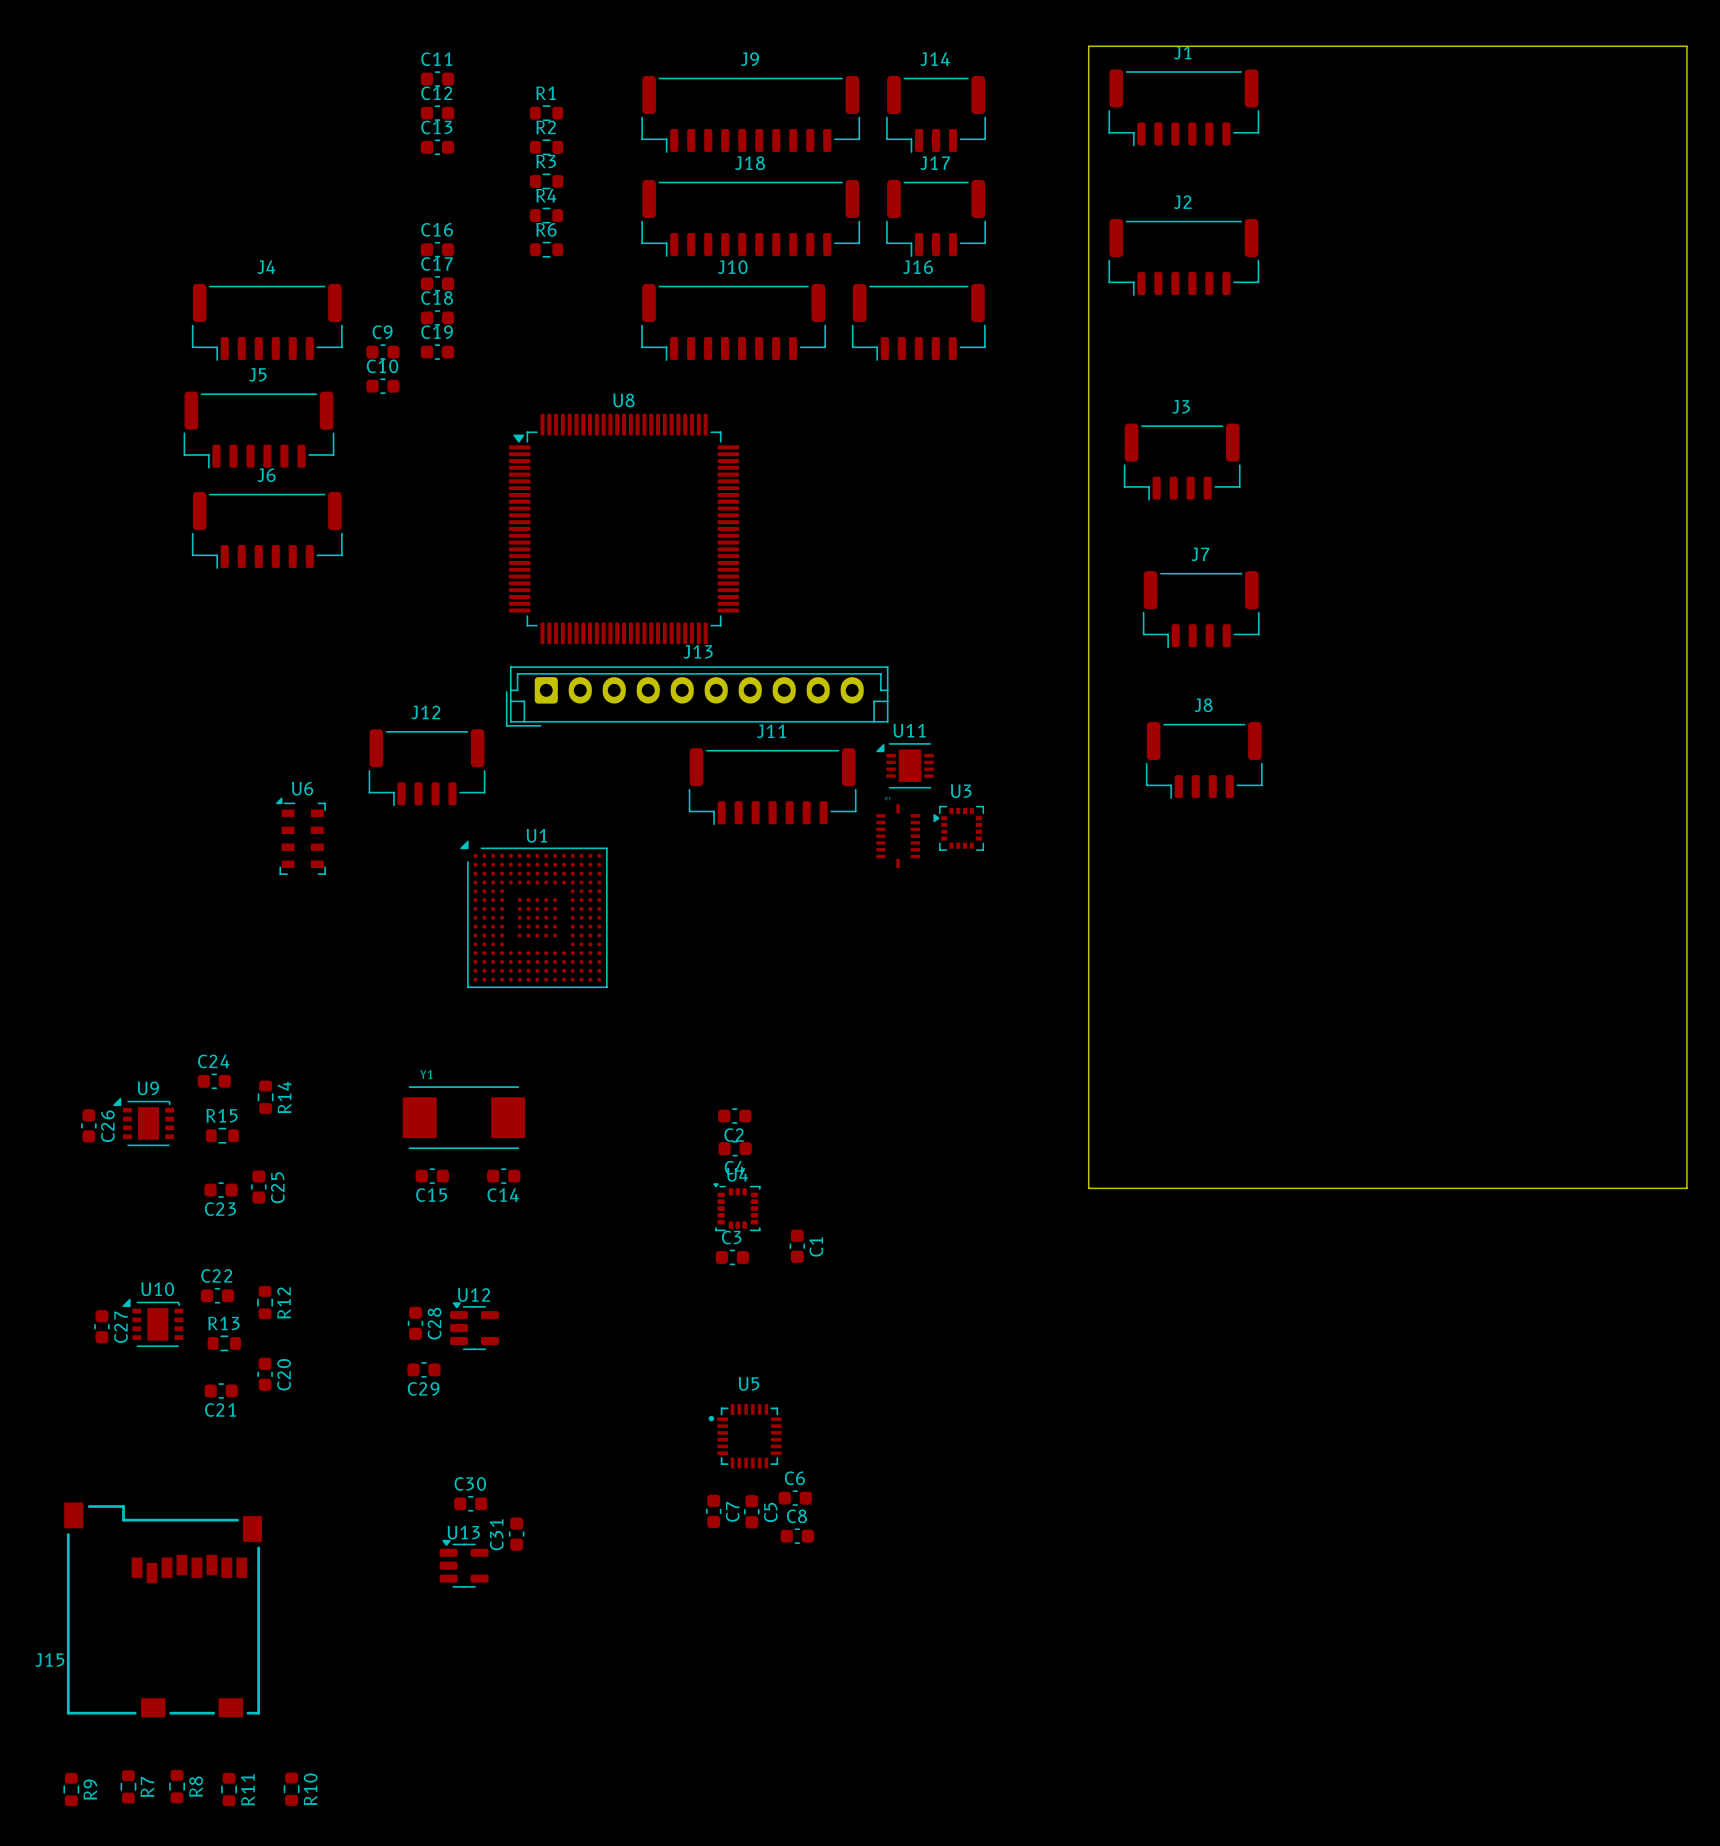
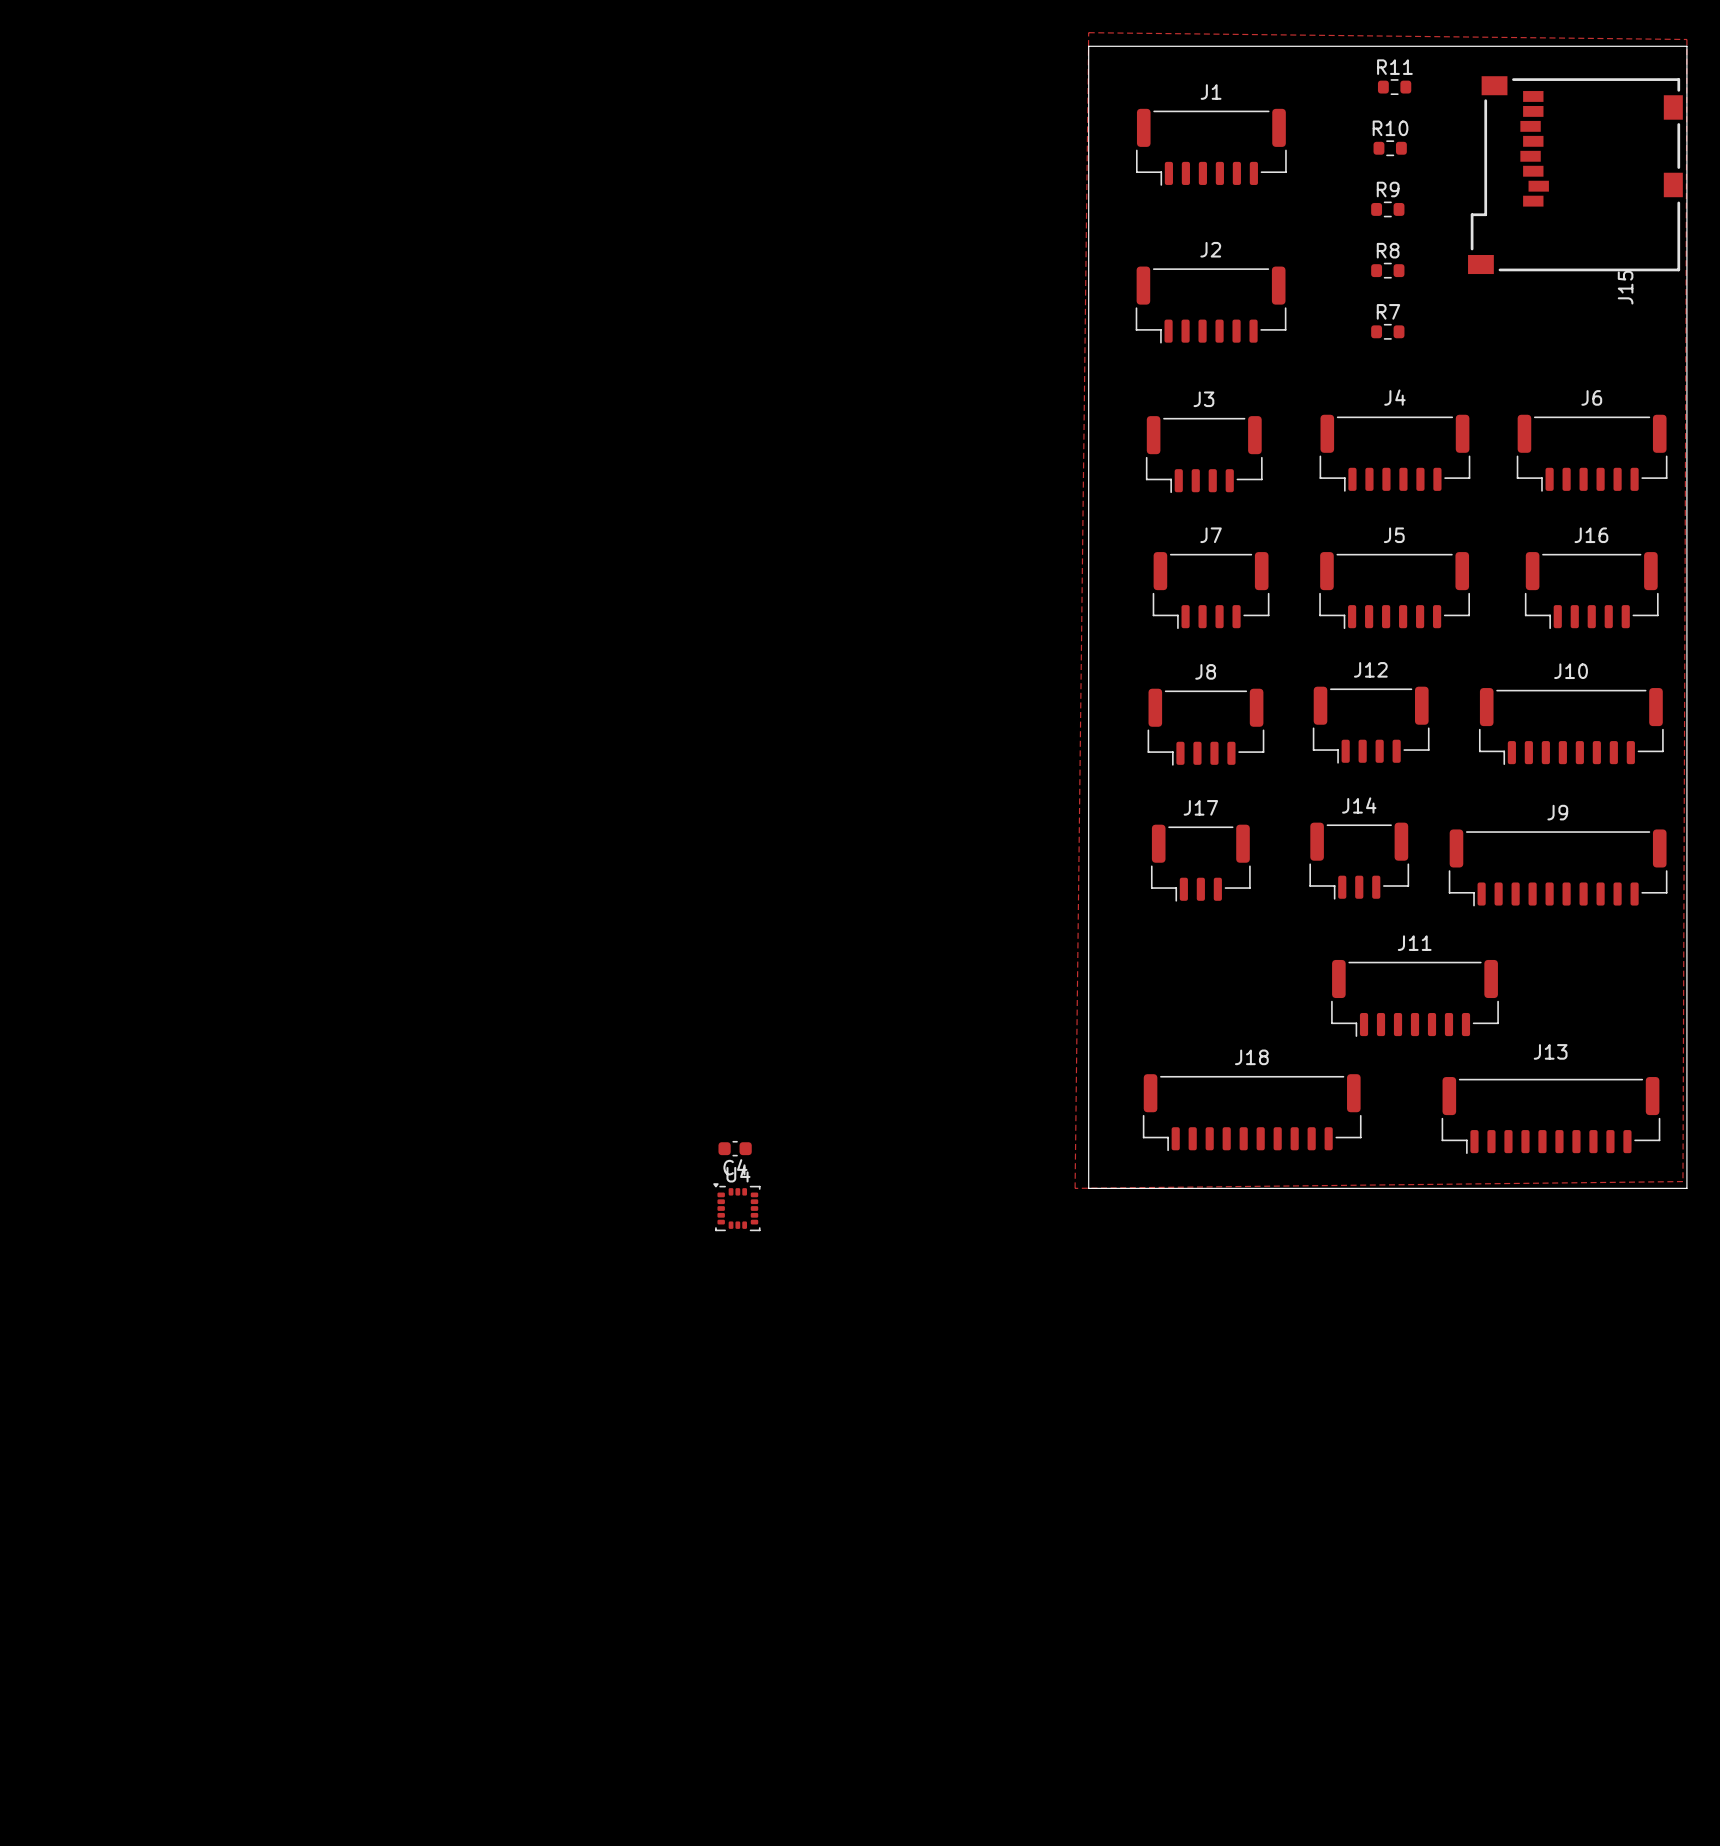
zone outline: none -> (1088, 32) (1075, 1188) (1682, 1181) (1686, 39) (1088, 32)
C11: (437, 79) -> none
J1 position: (1183, 107) -> (1211, 147)
C12: (437, 113) -> none
R1: (546, 113) -> none
J9 position: (750, 114) -> (1558, 867)
J14 position: (936, 114) -> (1359, 861)
C13: (437, 147) -> none
R2: (546, 147) -> none
R3: (546, 181) -> none
R4: (546, 215) -> none
J18 position: (750, 218) -> (1252, 1112)
J17 position: (936, 218) -> (1200, 863)
C16: (437, 249) -> none
R6: (546, 249) -> none
J2 position: (1183, 257) -> (1211, 305)
C17: (437, 283) -> none
C18: (437, 317) -> none
J4 position: (267, 322) -> (1394, 453)
J10 position: (733, 322) -> (1571, 726)
J16 position: (918, 322) -> (1591, 590)
C9: (382, 352) -> none
C19: (437, 352) -> none
C10: (382, 386) -> none
J5 position: (258, 430) -> (1394, 590)
J3 position: (1182, 462) -> (1204, 454)
U8: (624, 528) -> none
J6 position: (267, 530) -> (1592, 453)
J7 position: (1201, 609) -> (1211, 590)
J13: (697, 696) -> none
J8 position: (1204, 760) -> (1205, 727)
U11: (905, 765) -> none
J12 position: (427, 767) -> (1371, 725)
J11 position: (772, 786) -> (1415, 998)
U3: (958, 828) -> none
U6: (300, 836) -> none
part: (898, 836) -> none
U1: (533, 914) -> none
text: none -> J13 (1550, 1051)
C24: (214, 1081) -> none
R14: (265, 1097) -> none
part: none -> (1550, 1115)
C2: (734, 1116) -> none
Y1: (463, 1117) -> none
U9: (143, 1122) -> none
C26: (88, 1125) -> none
R15: (222, 1135) -> none
C15: (432, 1176) -> none
C14: (503, 1176) -> none
C25: (258, 1187) -> none
C23: (221, 1190) -> none
C1: (797, 1246) -> none
C3: (732, 1257) -> none
C22: (217, 1295) -> none
R12: (265, 1302) -> none
U10: (152, 1322) -> none
C28: (415, 1323) -> none
C27: (101, 1326) -> none
U12: (474, 1326) -> none
R13: (224, 1343) -> none
C29: (424, 1369) -> none
C20: (265, 1374) -> none
C21: (221, 1390) -> none
U5: (745, 1436) -> none
C6: (795, 1498) -> none
C30: (470, 1503) -> none
C7: (713, 1511) -> none
C5: (751, 1511) -> none
C31: (516, 1534) -> none
C8: (797, 1536) -> none
U13: (464, 1563) -> none
J15 rotation: 0° (163, 1609) -> 90° counterclockwise (1575, 175)
J15 position: (163, 1609) -> (1575, 175)
R7 rotation: 0° (128, 1786) -> 90° clockwise (1387, 331)
R7 position: (128, 1786) -> (1387, 331)
R8 rotation: 0° (177, 1786) -> 90° clockwise (1387, 270)
R8 position: (177, 1786) -> (1387, 270)
R8 name position: R8 (196, 1786) -> R8 (1388, 250)
R7 name position: R7 (147, 1787) -> R7 (1388, 311)
R9 rotation: 0° (71, 1789) -> 90° clockwise (1387, 209)
R9 position: (71, 1789) -> (1387, 209)
R9 name position: R9 (90, 1789) -> R9 (1388, 189)
R11 rotation: 0° (229, 1789) -> 90° clockwise (1394, 87)
R11 position: (229, 1789) -> (1394, 87)
R11 name position: R11 (247, 1789) -> R11 (1394, 67)
R10 rotation: 0° (291, 1789) -> 90° clockwise (1390, 148)
R10 position: (291, 1789) -> (1390, 148)
R10 name position: R10 (310, 1789) -> R10 (1390, 128)

